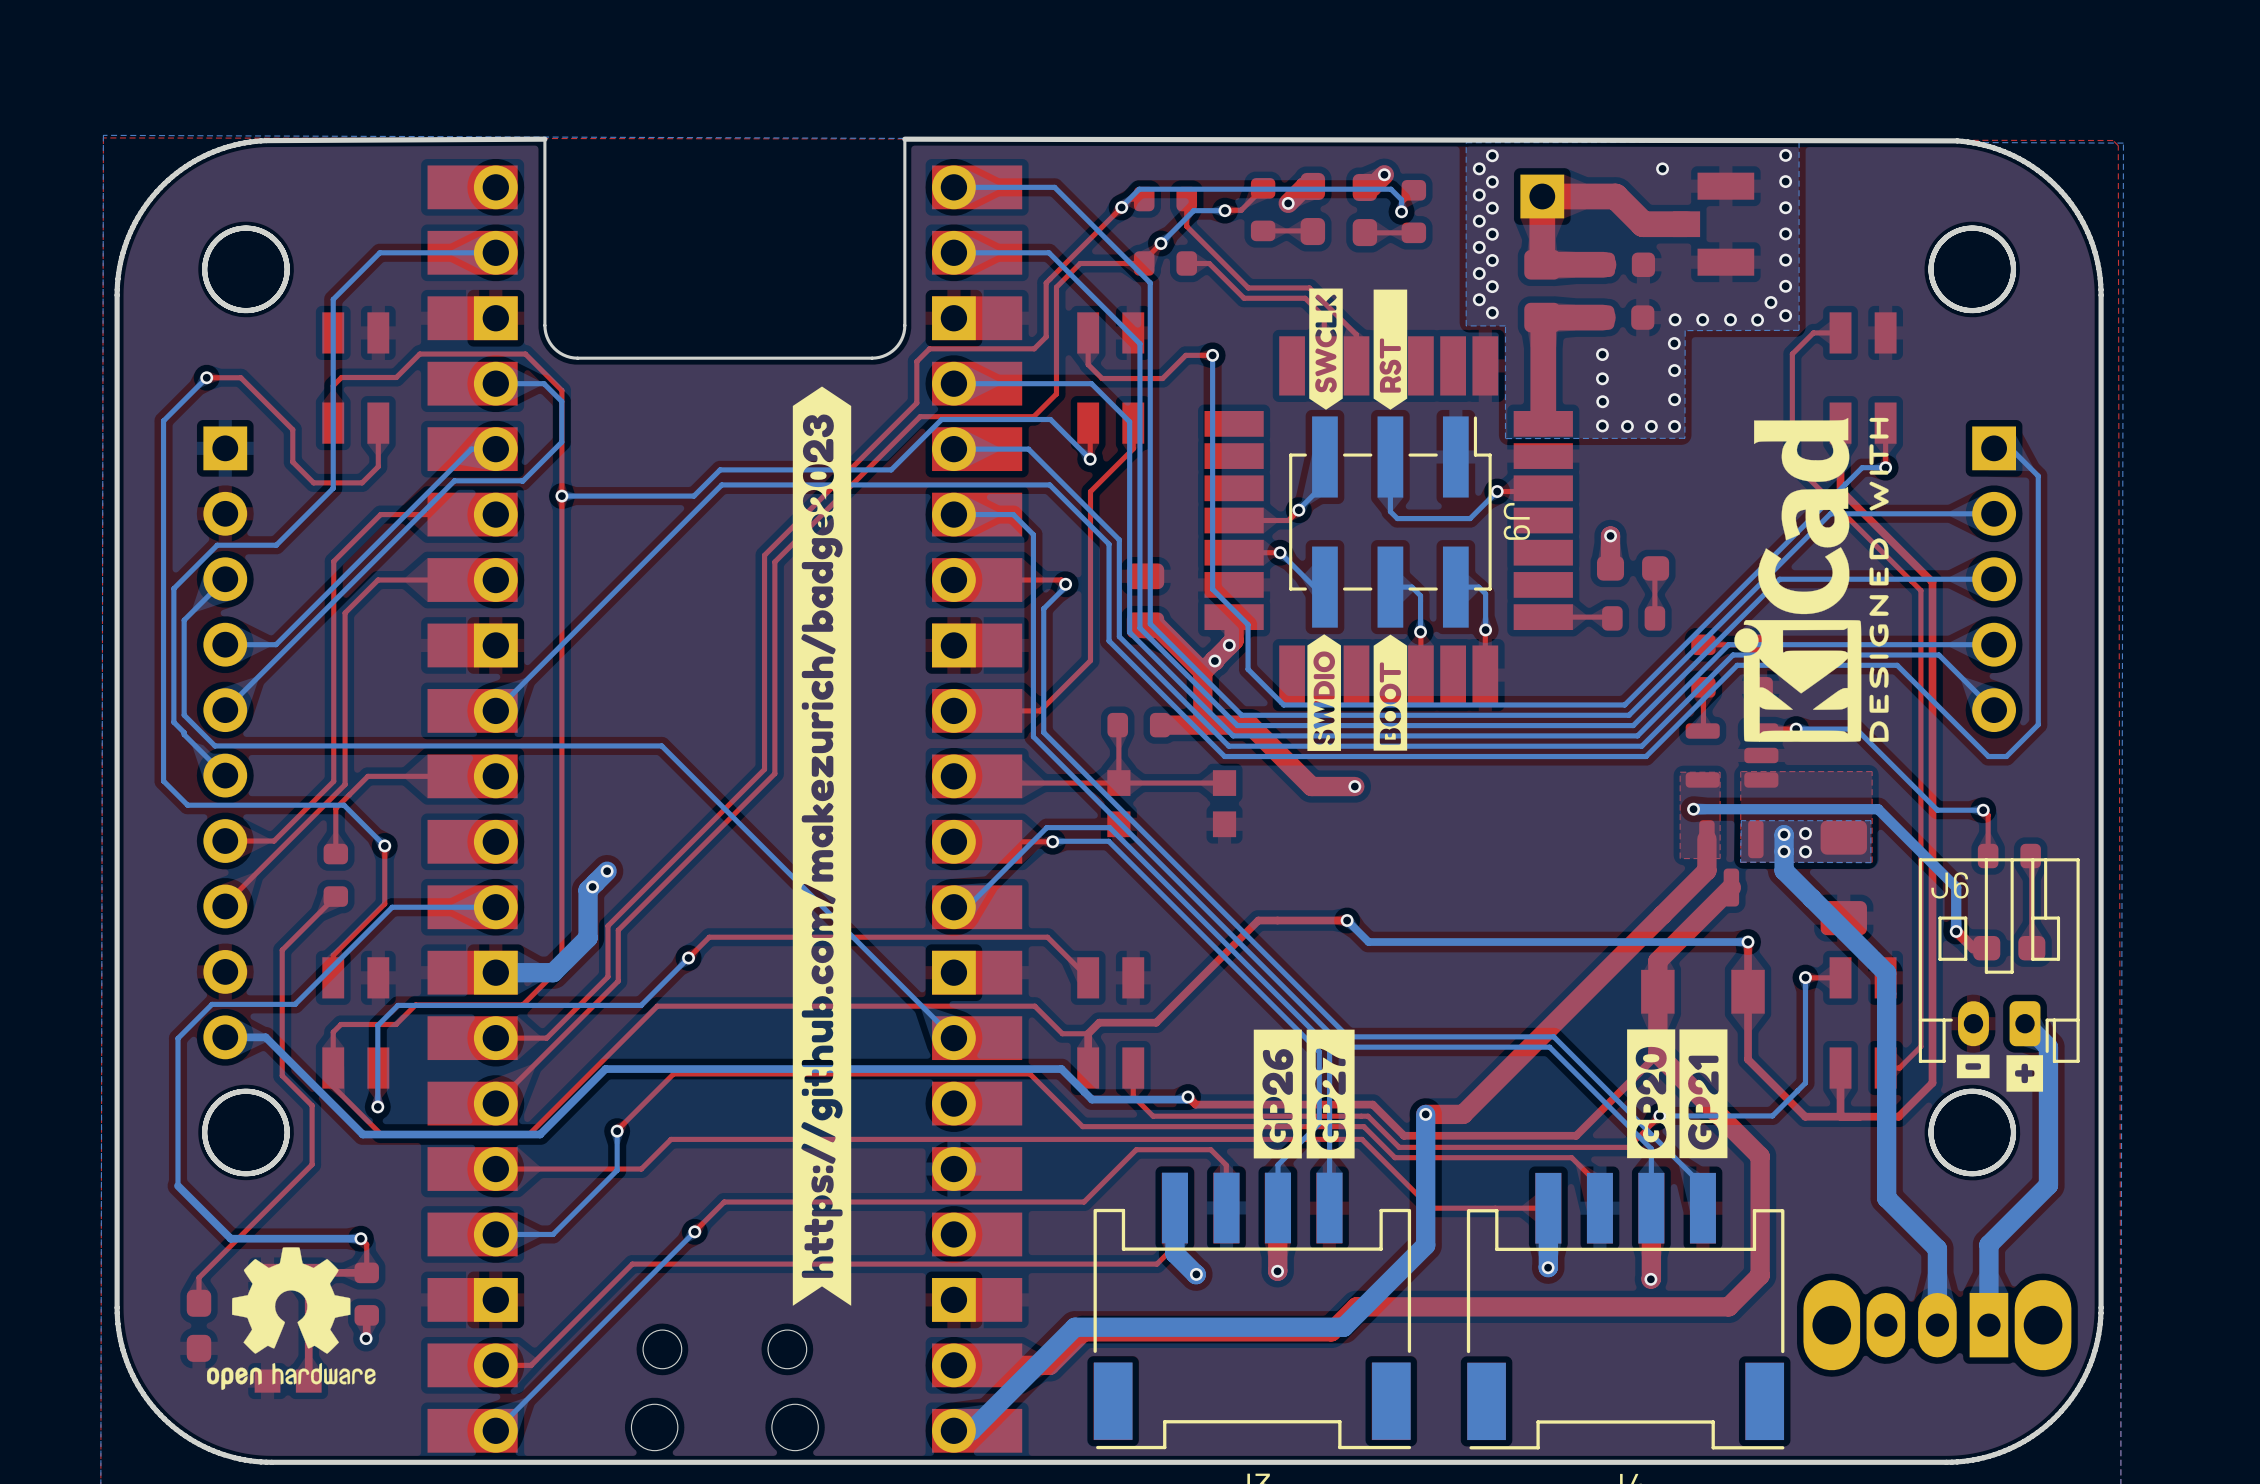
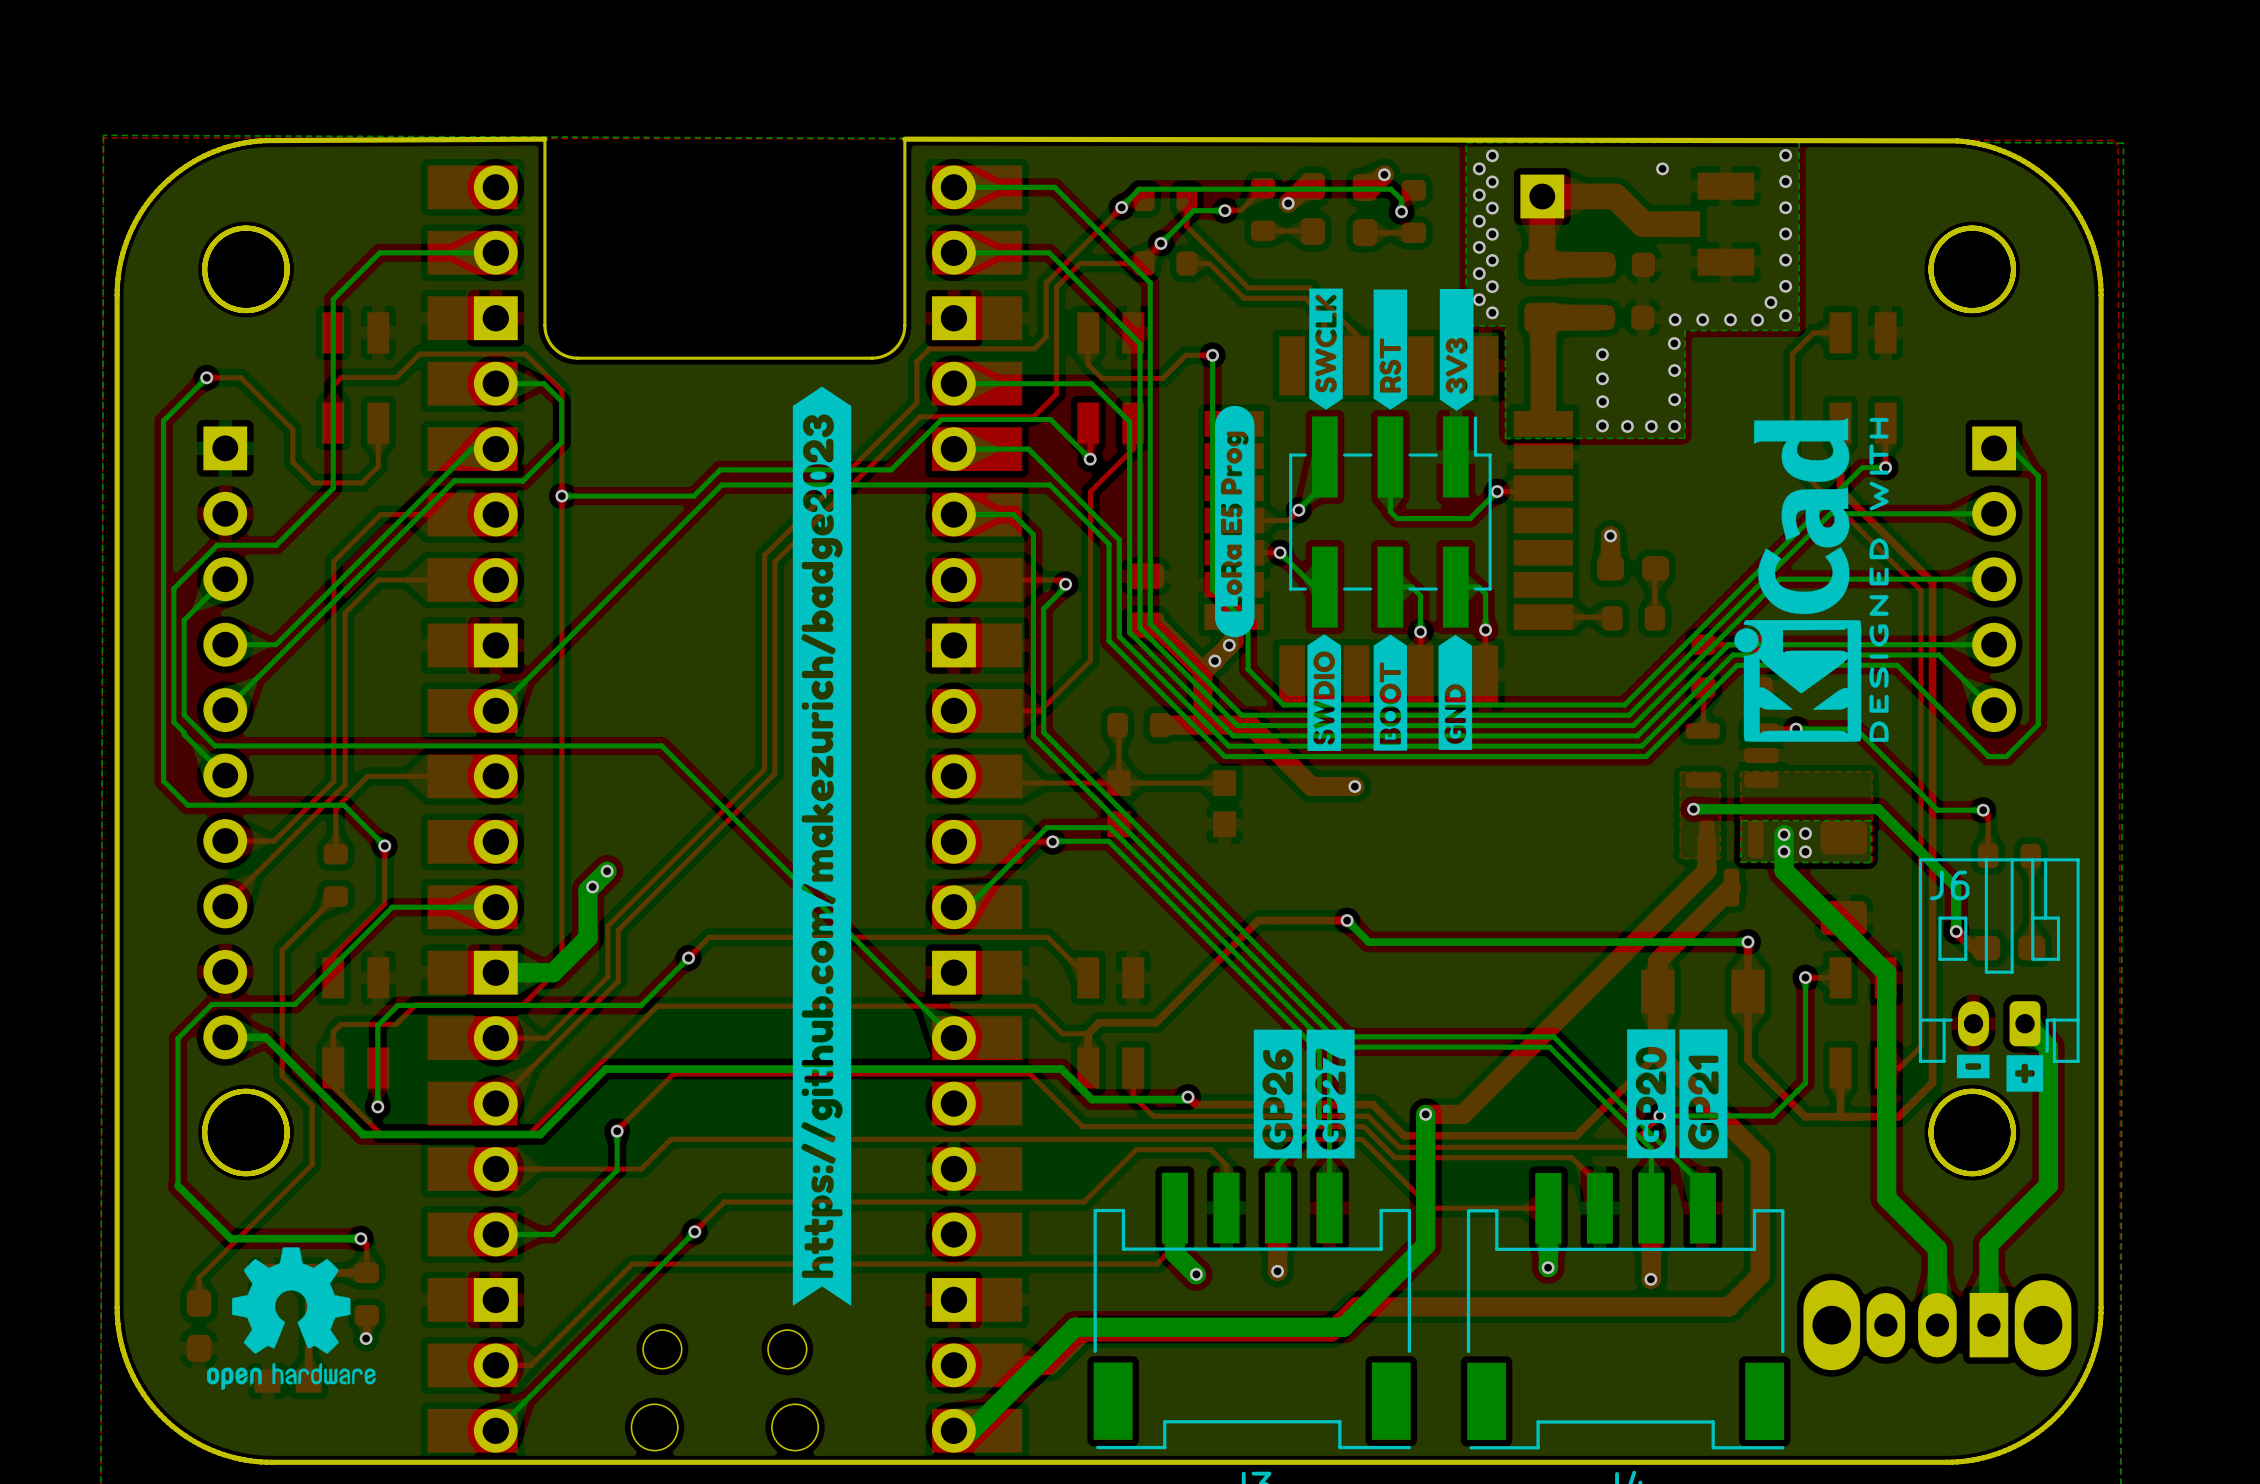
drawing: none -> [1439, 288, 1474, 411]
drawing: none -> [1215, 405, 1255, 638]
J9 name: J9 (1516, 521) -> none
drawing: none -> [1438, 634, 1473, 750]

